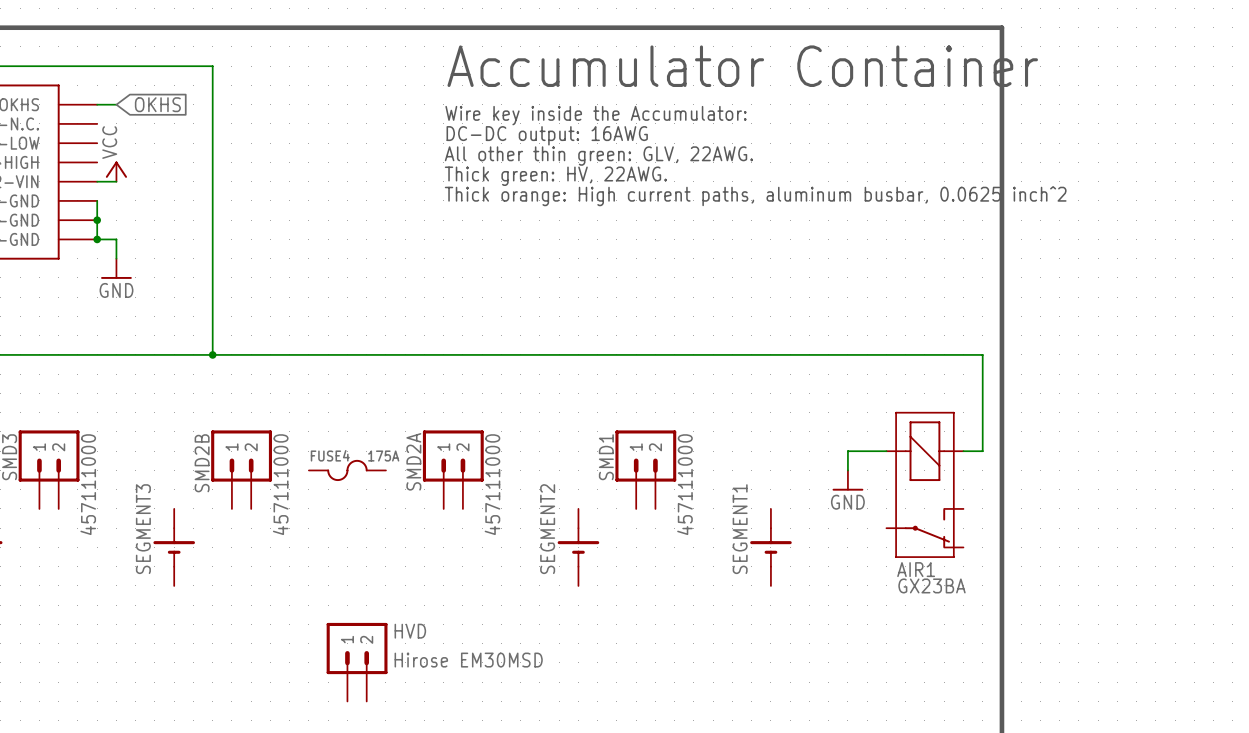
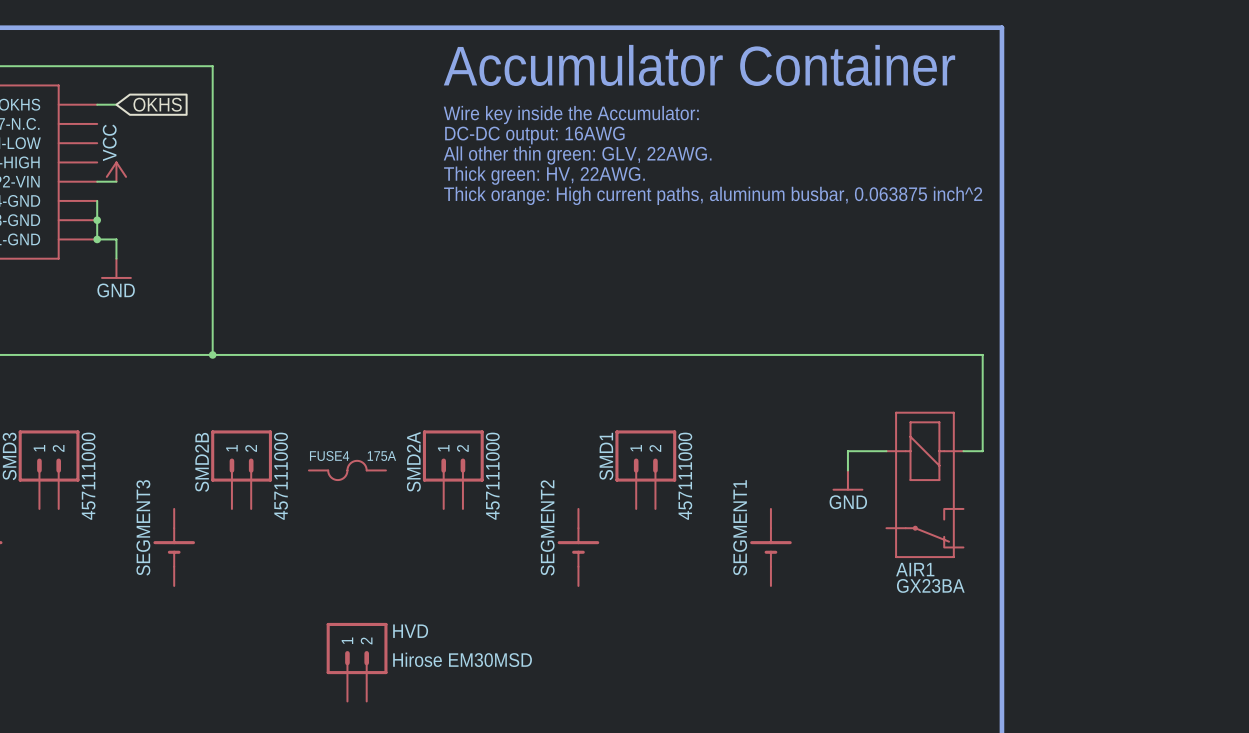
text: Thick orange: High current paths, aluminum busbar, 0.0625 inch^2 (755, 196) -> Thick orange: High current paths, aluminum busbar, 0.063875 inch^2 (713, 195)

